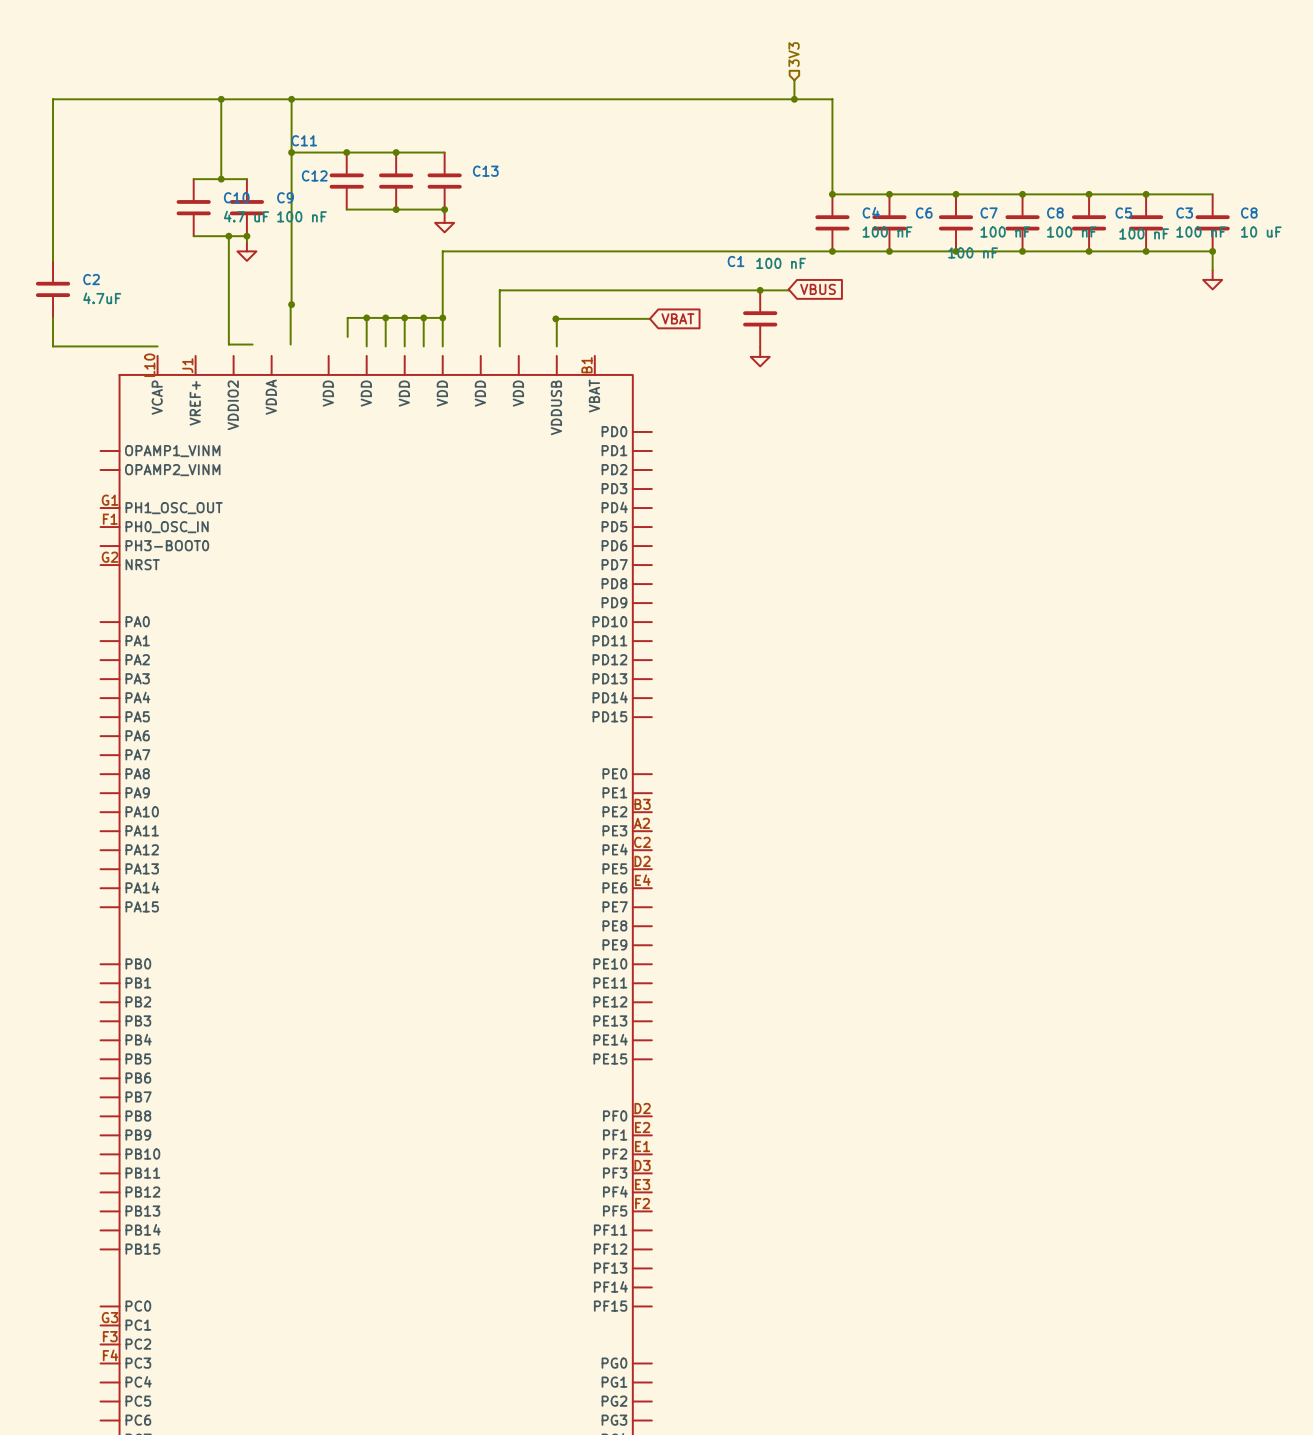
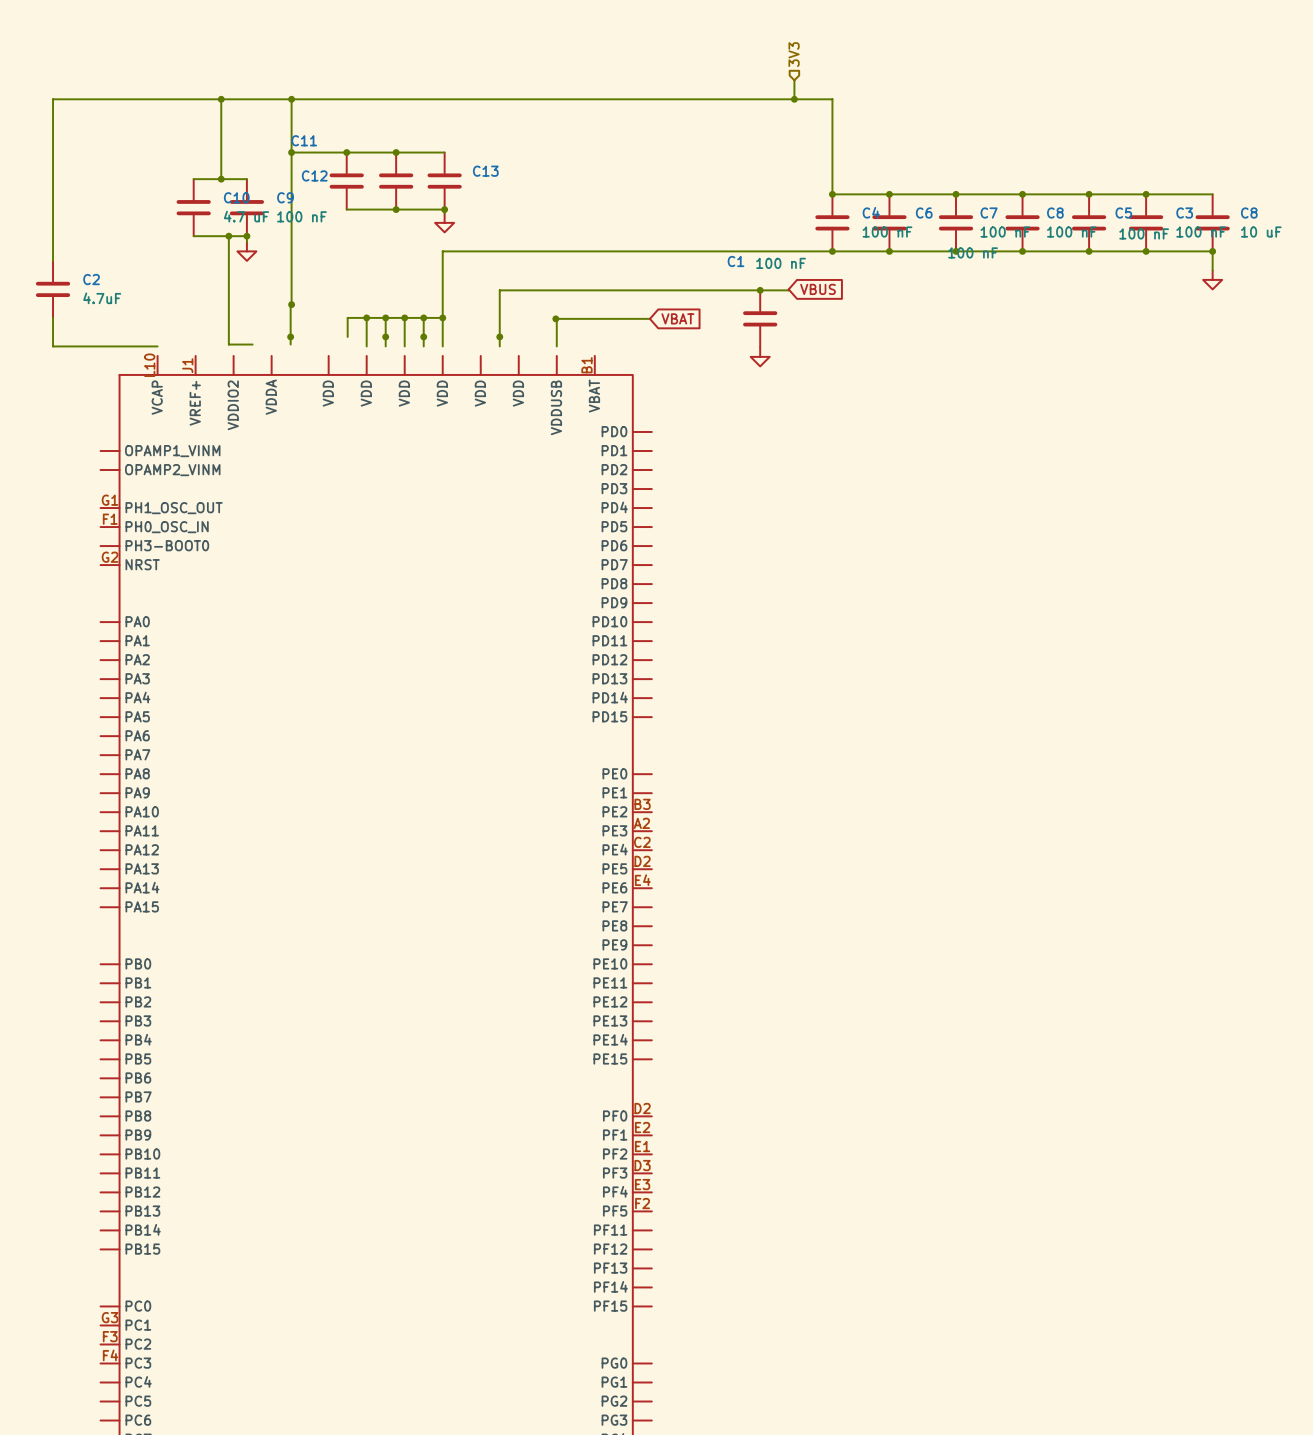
junction: none -> (290, 336)
junction: none -> (385, 336)
junction: none -> (423, 336)
junction: none -> (499, 336)

